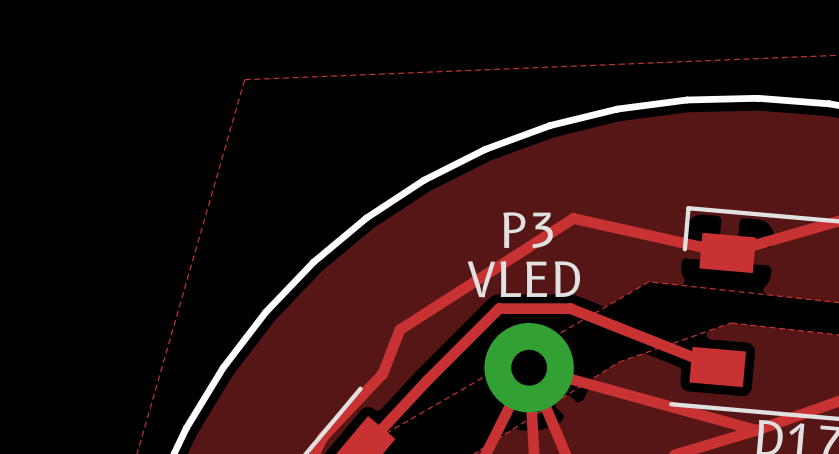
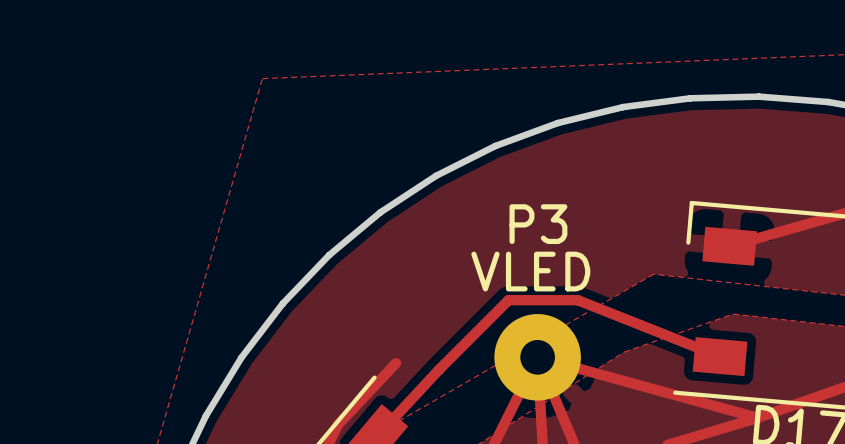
track: (727, 252) (573, 218) (399, 329) (382, 373) -> none

